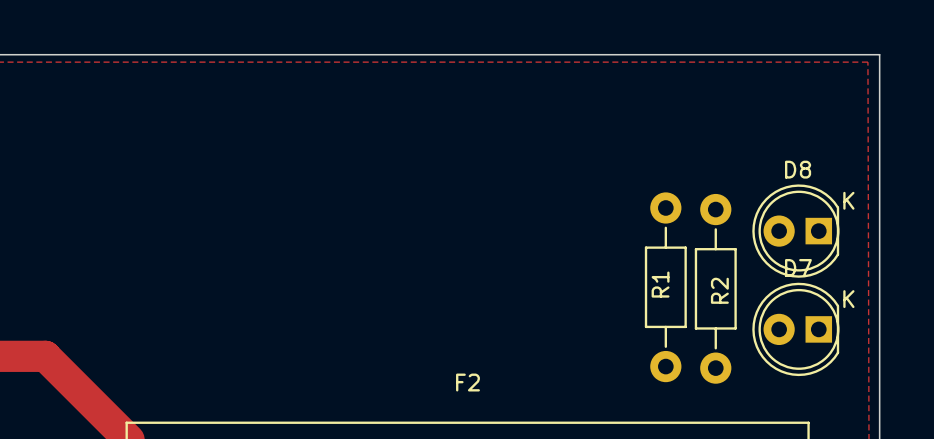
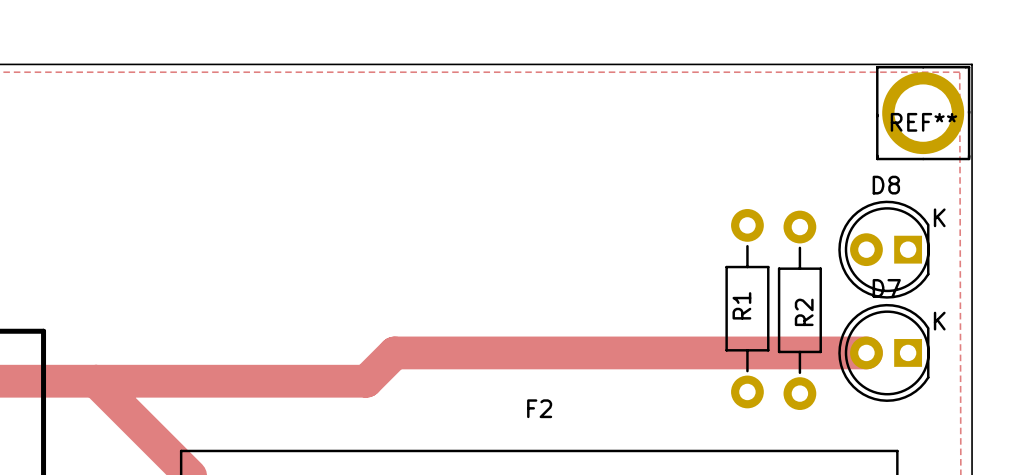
REF**: none -> (923, 113)
track: none -> (866, 352) (394, 352) (366, 381) (95, 381)

